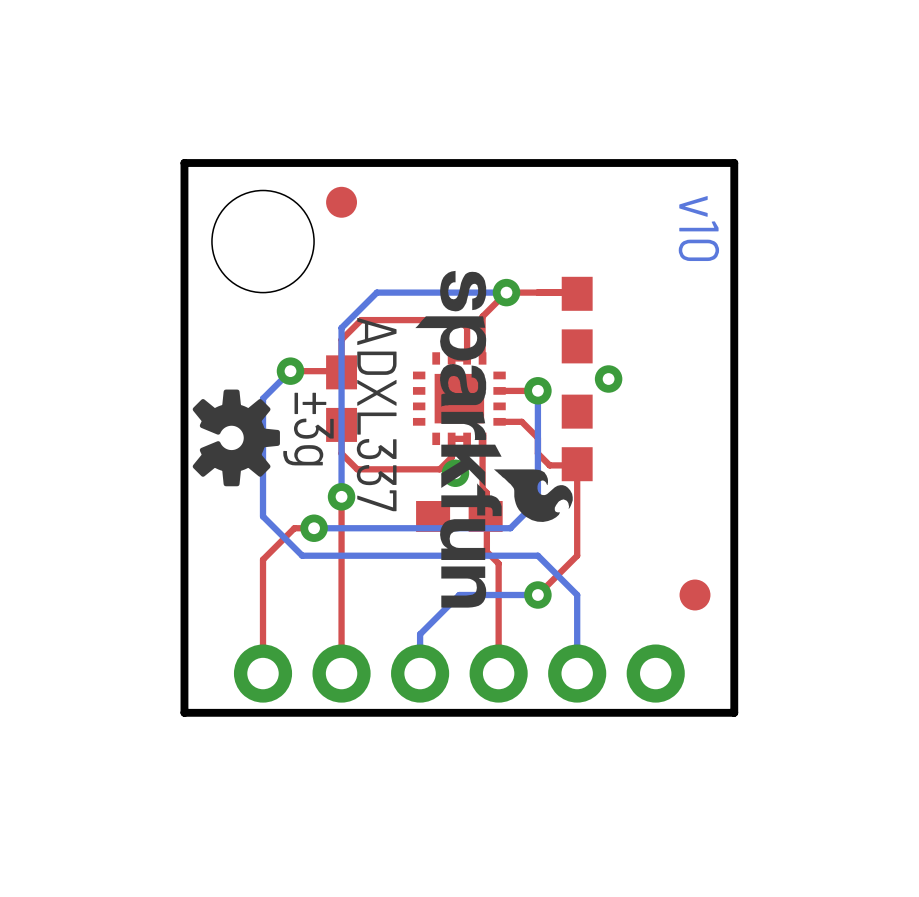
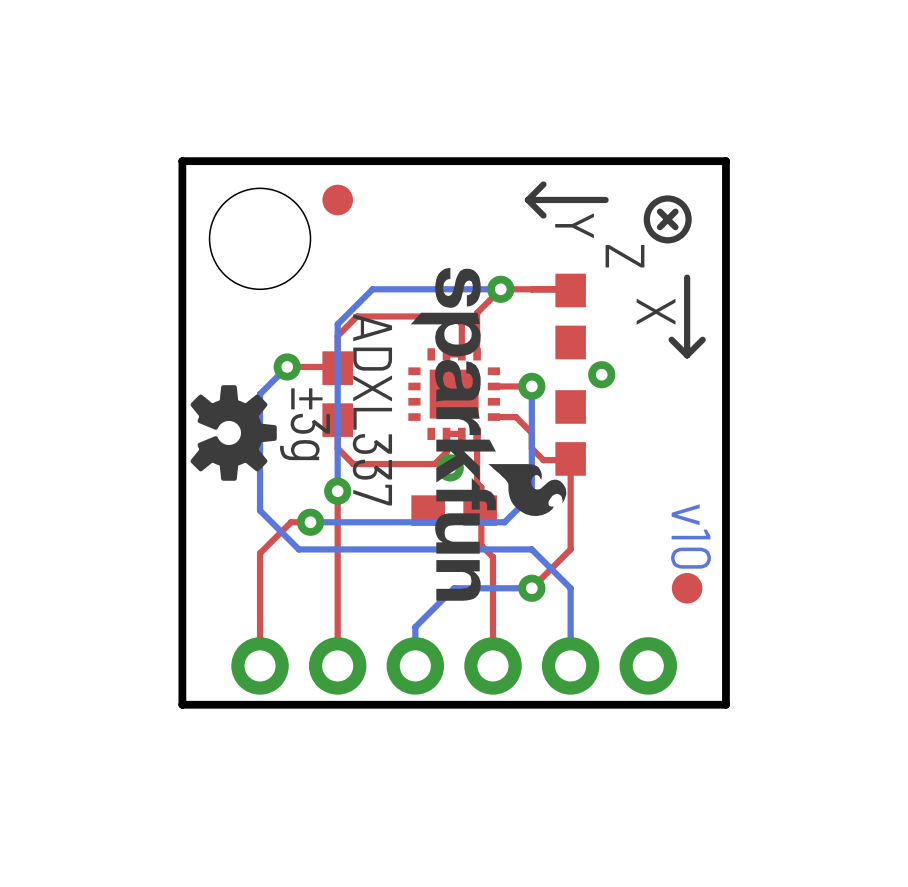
line: none -> (543, 184) (527, 199)
drawing: none -> [643, 195, 692, 244]
line: none -> (527, 199) (543, 215)
line: none -> (605, 199) (527, 199)
line: none -> (659, 211) (675, 227)
line: none -> (675, 211) (659, 227)
text: none -> Y (574, 225)
text position: v10 (698, 228) -> v10 (690, 536)
text: none -> Z (625, 256)
line: none -> (687, 277) (687, 355)
text: none -> X (656, 311)
line: none -> (671, 339) (687, 355)
line: none -> (702, 339) (687, 355)

